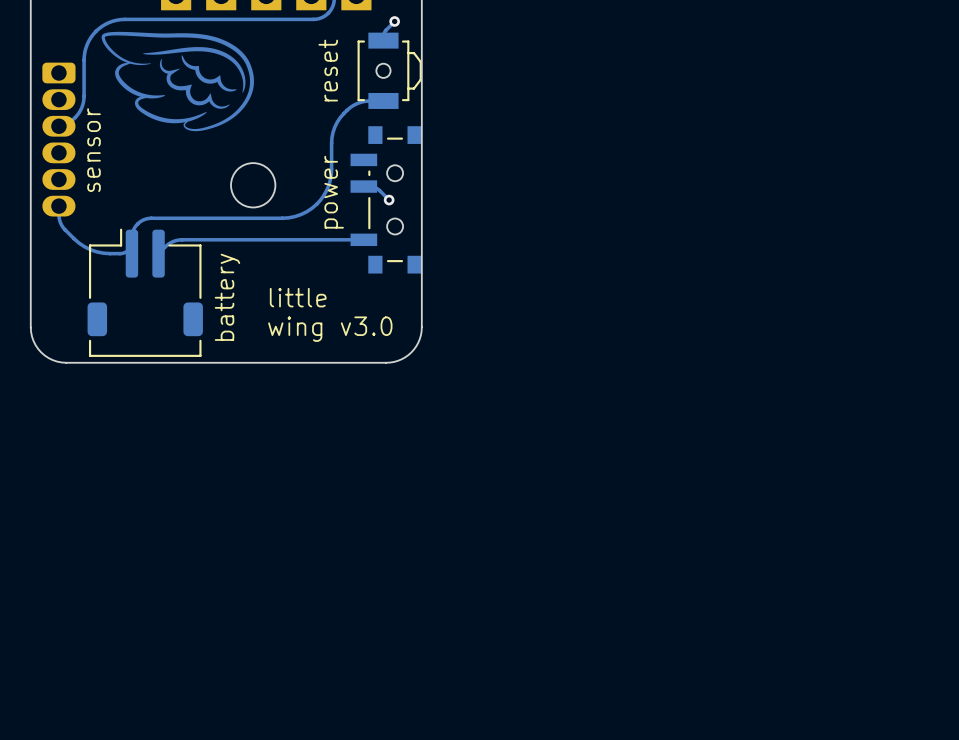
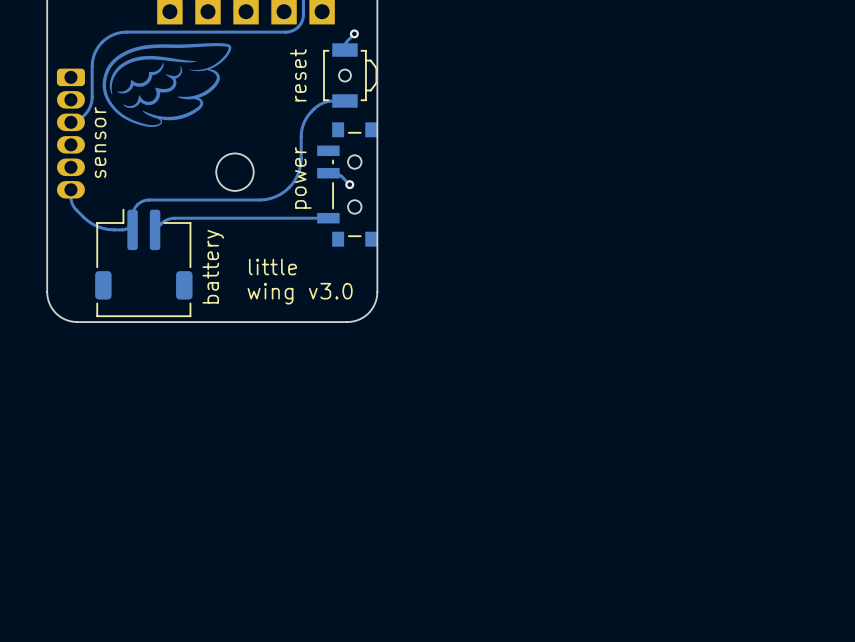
drawing shape: [101, 31, 255, 132] -> [102, 43, 232, 127]
drawing: none -> [109, 55, 197, 109]
drawing: [143, 47, 246, 109] -> none

